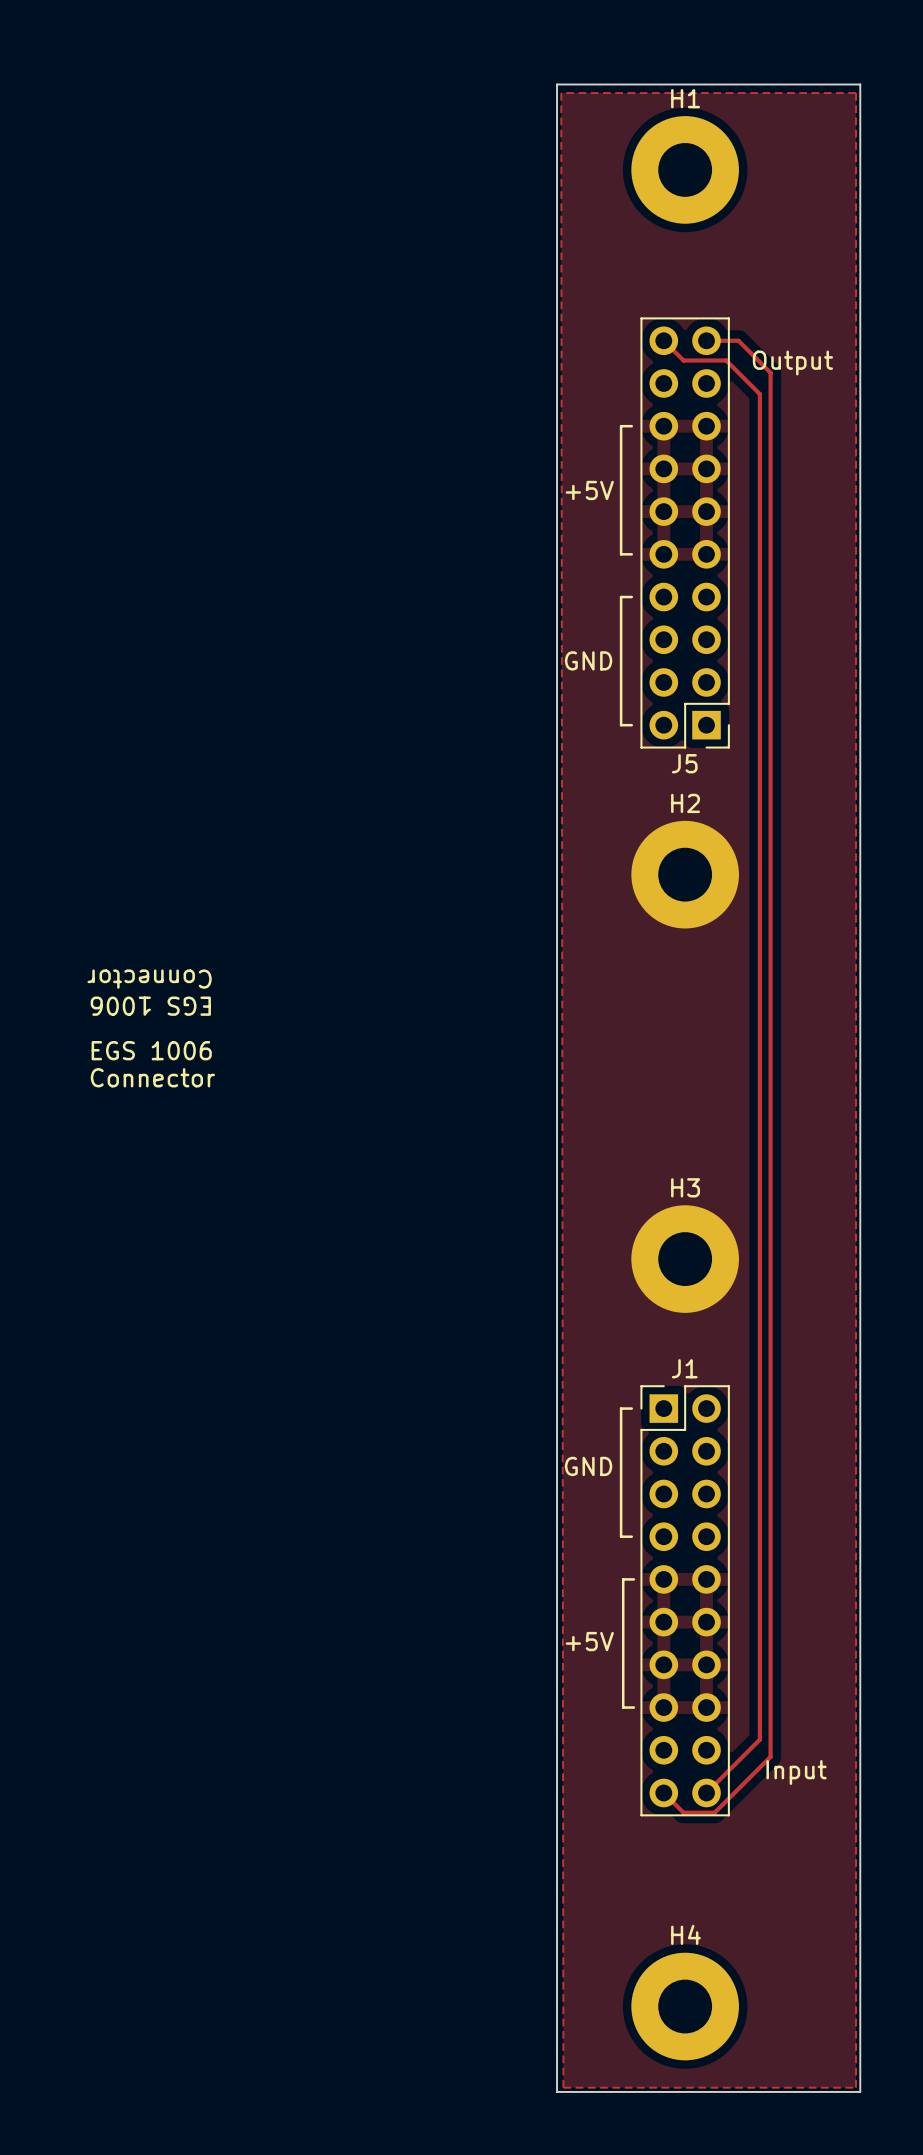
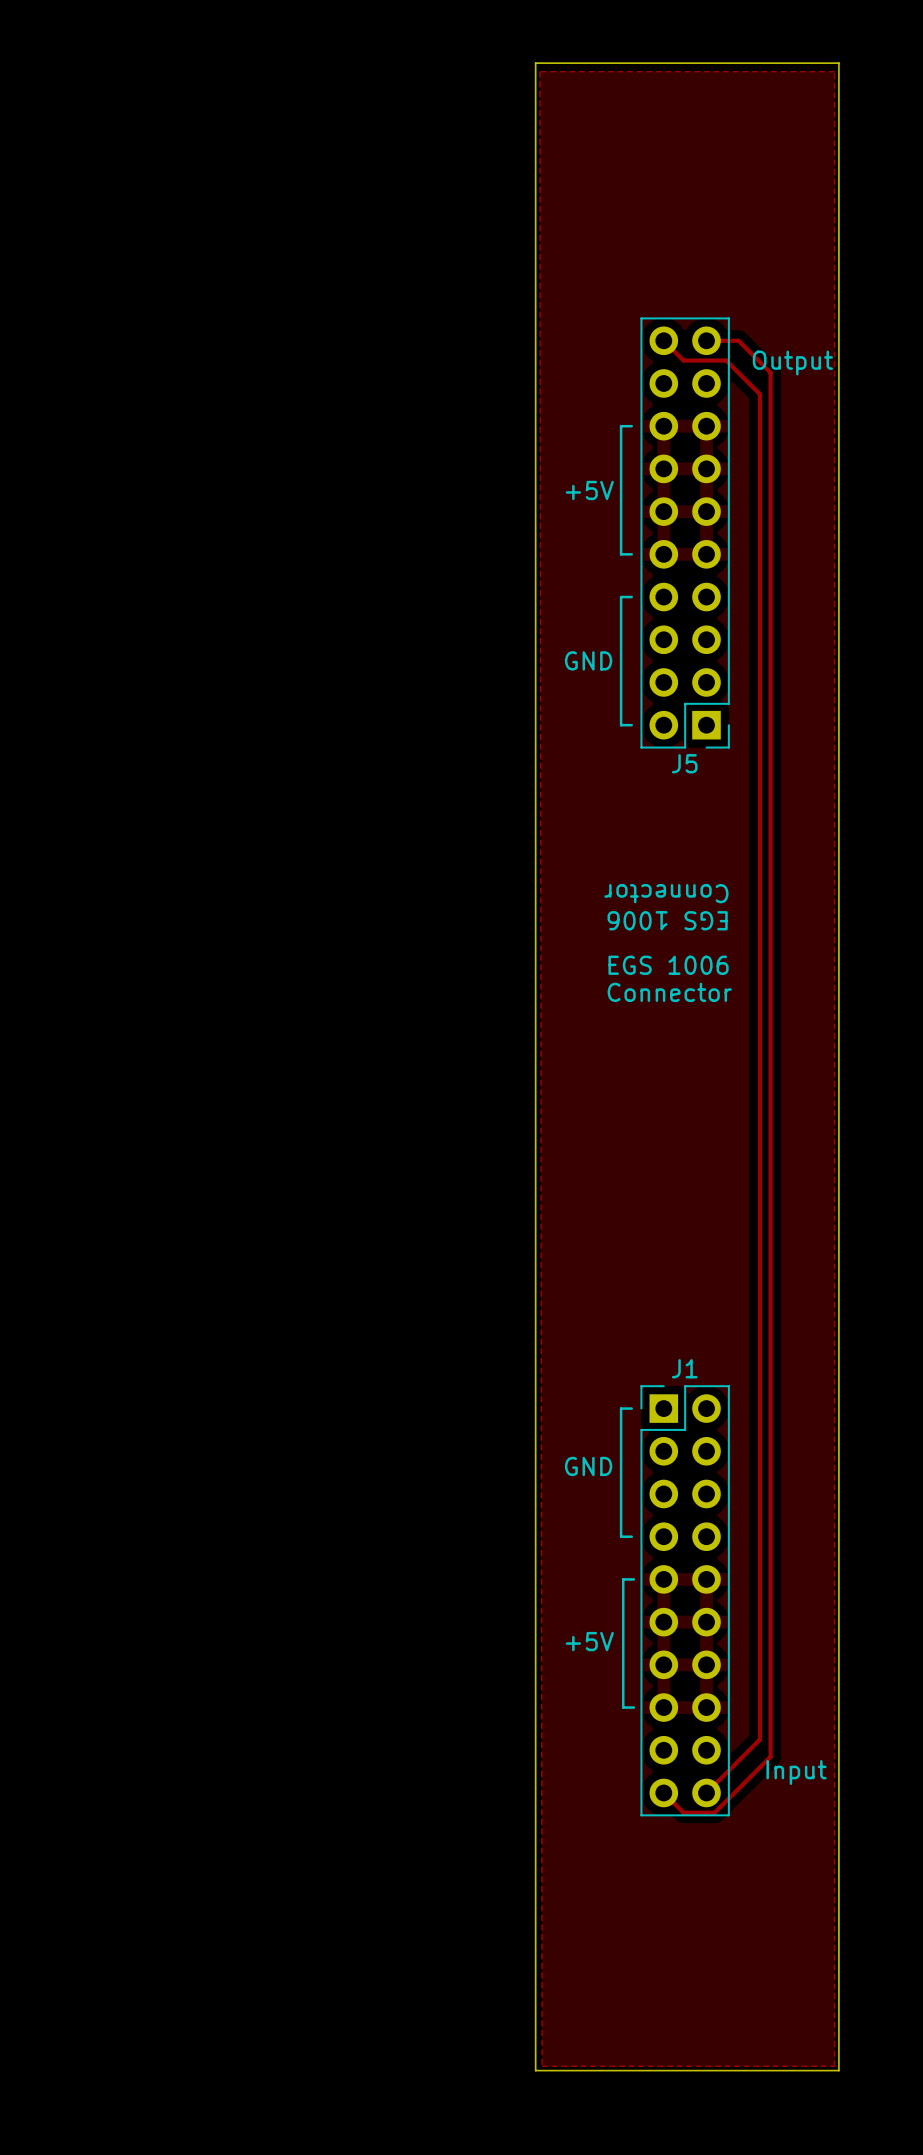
board edge: (557, 84) (860, 84) (860, 2091) (557, 2091) (557, 84) -> (535, 63) (838, 63) (838, 2070) (535, 2070) (535, 63)
zone outline: (561, 93) (563, 2087) (856, 2087) (856, 93) (561, 93) -> (539, 71) (542, 2066) (834, 2066) (834, 71) (539, 71)
H1: (685, 169) -> none
H2: (685, 874) -> none
text: none -> Connector (666, 893)
text: none -> EGS 1006 (667, 920)
text: none -> EGS 1006 (668, 965)
text: Connector (149, 979) -> none
text: none -> Connector (669, 992)
text: EGS 1006 (150, 1006) -> none
text: EGS 1006 (151, 1050) -> none
text: Connector (152, 1077) -> none
H3: (685, 1259) -> none
H4: (685, 2006) -> none

